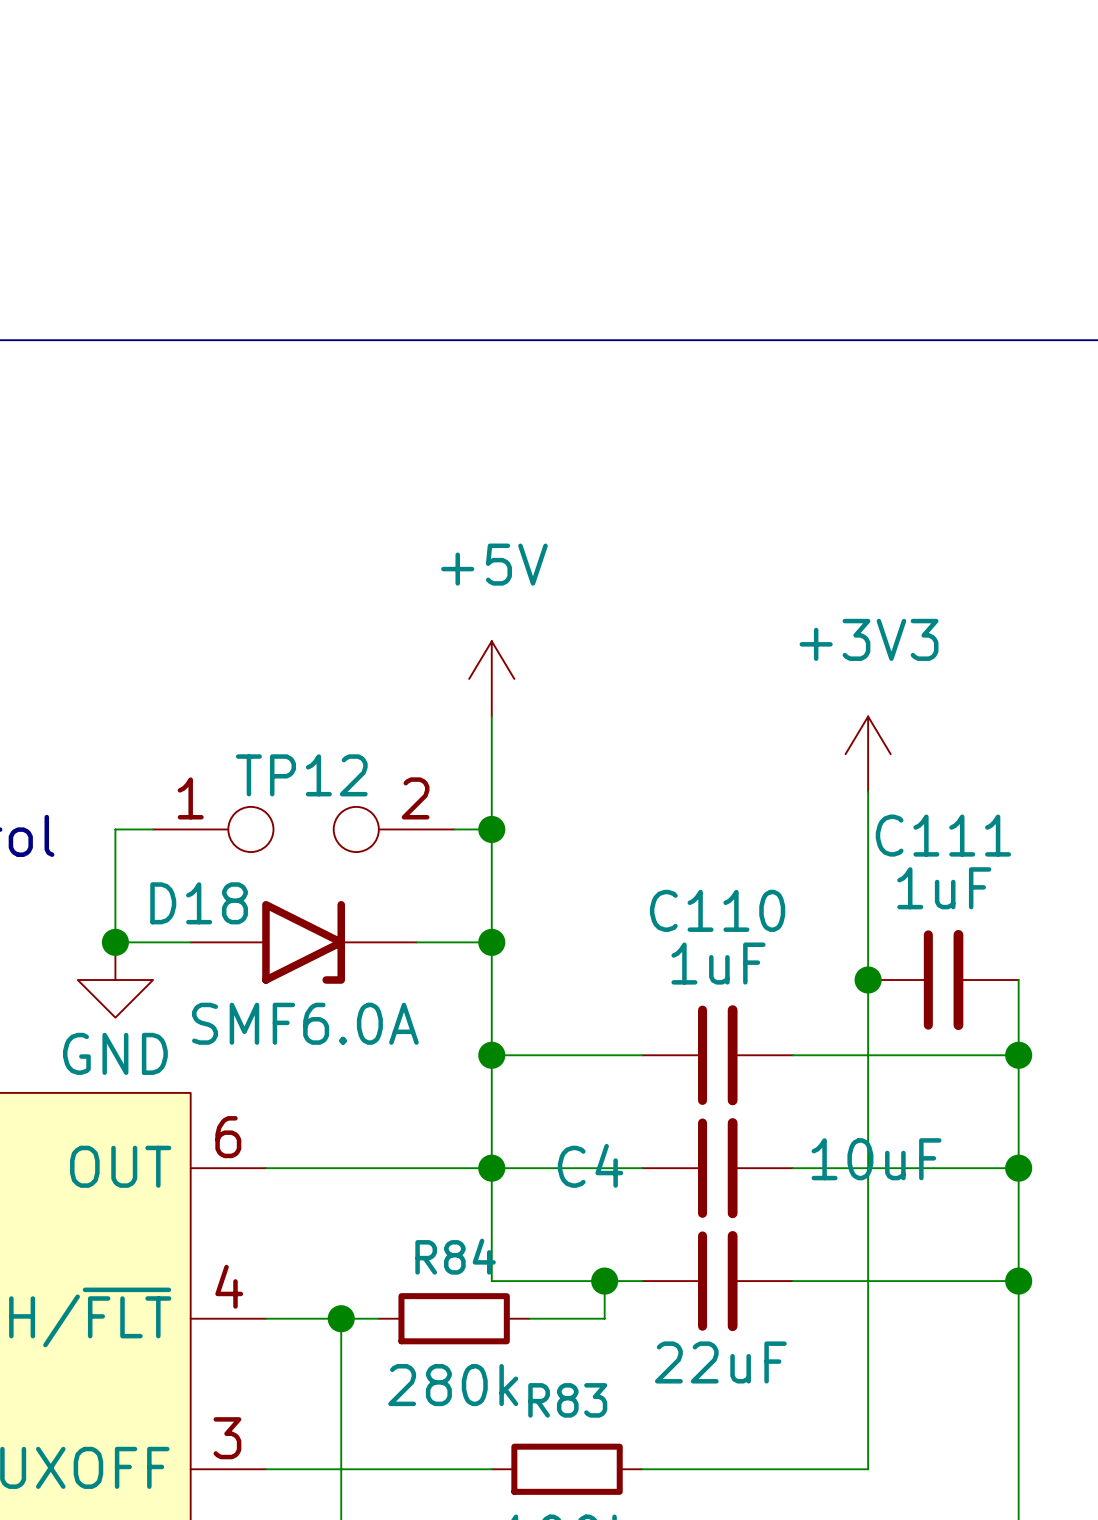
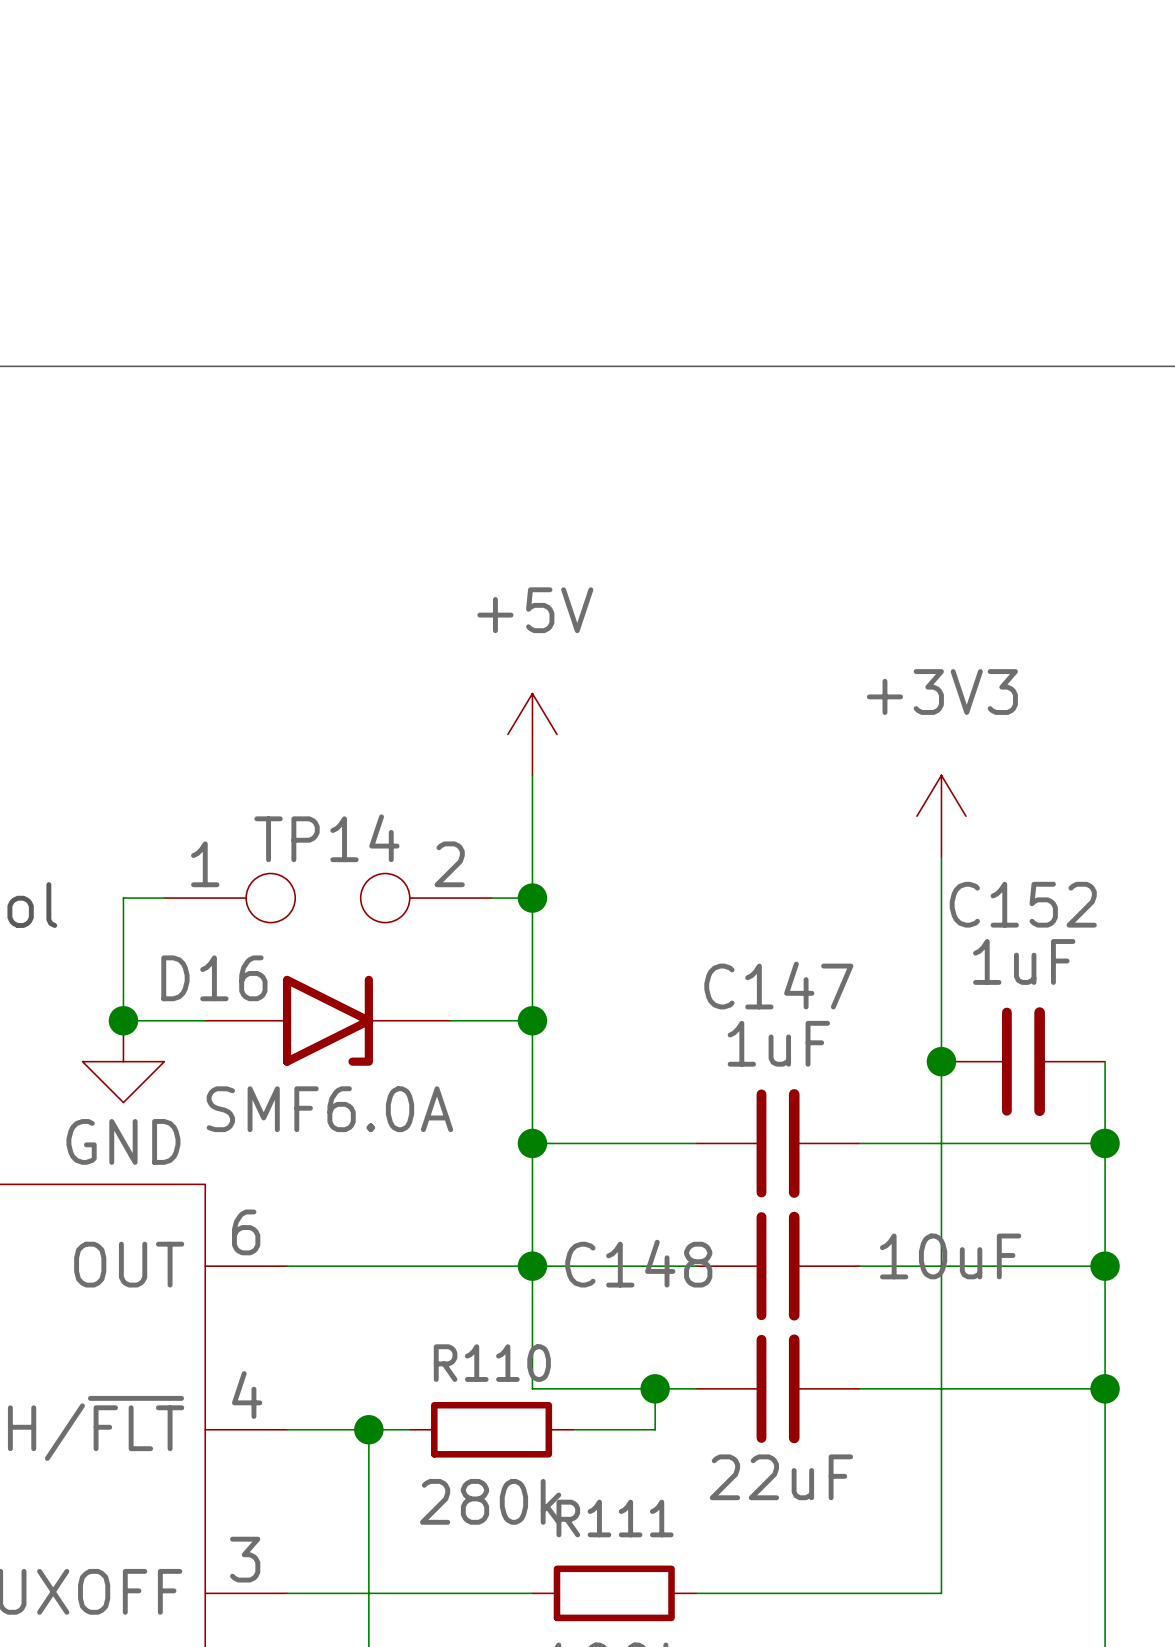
TP12 name: TP12 (301, 775) -> TP14 (326, 838)
C111 name: C111 (943, 835) -> C152 (1023, 904)
D18 name: D18 (199, 903) -> D16 (214, 978)
C110 name: C110 (717, 910) -> C147 (778, 985)
C4 name: C4 (590, 1165) -> C148 (638, 1263)
R84 name: R84 (455, 1256) -> R110 (492, 1363)
R83 name: R83 (567, 1400) -> R111 (615, 1518)

